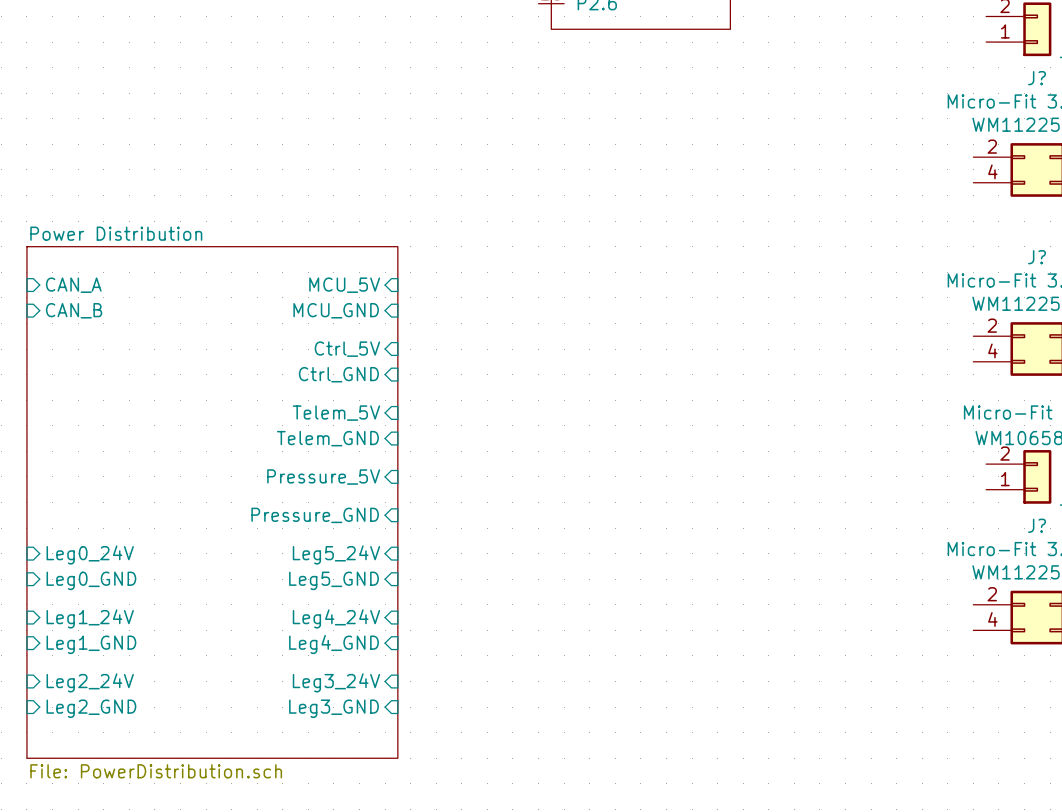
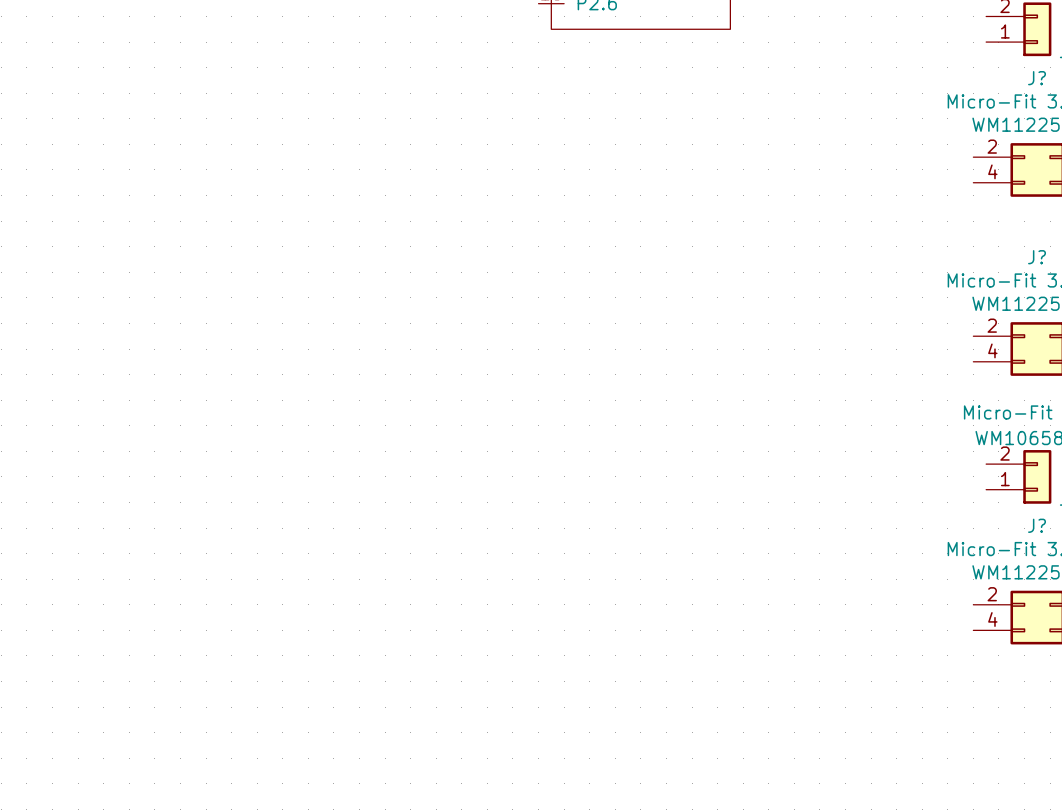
sheet pin: CAN_A (73, 285) -> none
sheet pin: MCU_5V (344, 285) -> none
sheet pin: CAN_B (74, 310) -> none
sheet pin: MCU_GND (336, 310) -> none
sheet pin: Ctrl_5V (347, 349) -> none
sheet pin: Ctrl_GND (338, 374) -> none
sheet pin: Telem_5V (336, 413) -> none
sheet pin: Telem_GND (327, 438) -> none
sheet pin: Pressure_5V (323, 477) -> none
sheet Power Distribution: File: PowerDistribution.sch (212, 502) -> none
sheet pin: Pressure_GND (315, 515) -> none
sheet pin: Leg0_24V (90, 554) -> none
sheet pin: Leg5_24V (336, 554) -> none
sheet pin: Leg0_GND (91, 580) -> none
sheet pin: Leg5_GND (334, 580) -> none
sheet pin: Leg1_24V (90, 618) -> none
sheet pin: Leg4_24V (336, 618) -> none
sheet pin: Leg1_GND (91, 644) -> none
sheet pin: Leg4_GND (334, 644) -> none
sheet pin: Leg2_24V (90, 682) -> none
sheet pin: Leg3_24V (336, 682) -> none
sheet pin: Leg2_GND (91, 708) -> none
sheet pin: Leg3_GND (334, 708) -> none

